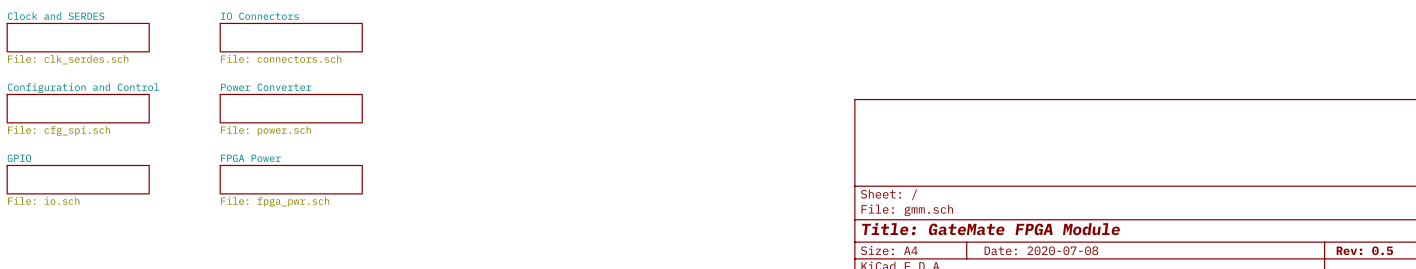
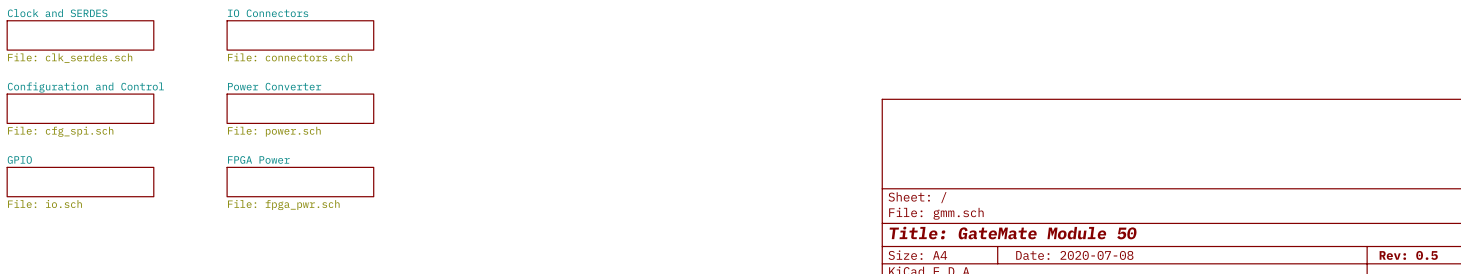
title block: Title: GateMate FPGA Module (990, 229) -> Title: GateMate Module 50 (1013, 233)

